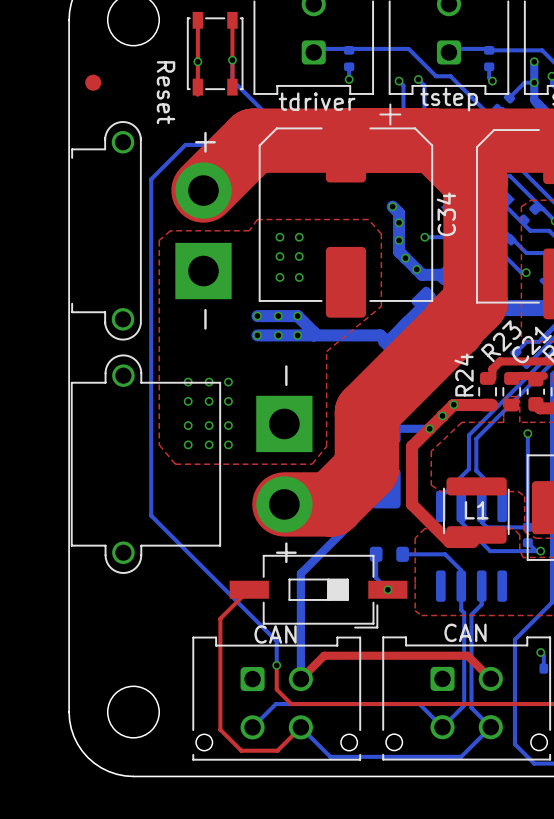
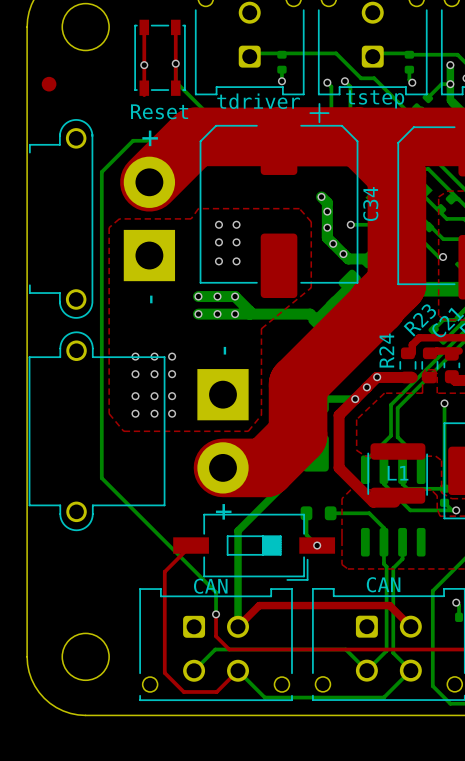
text rotation: 0° (166, 92) -> 90° counterclockwise (159, 111)

